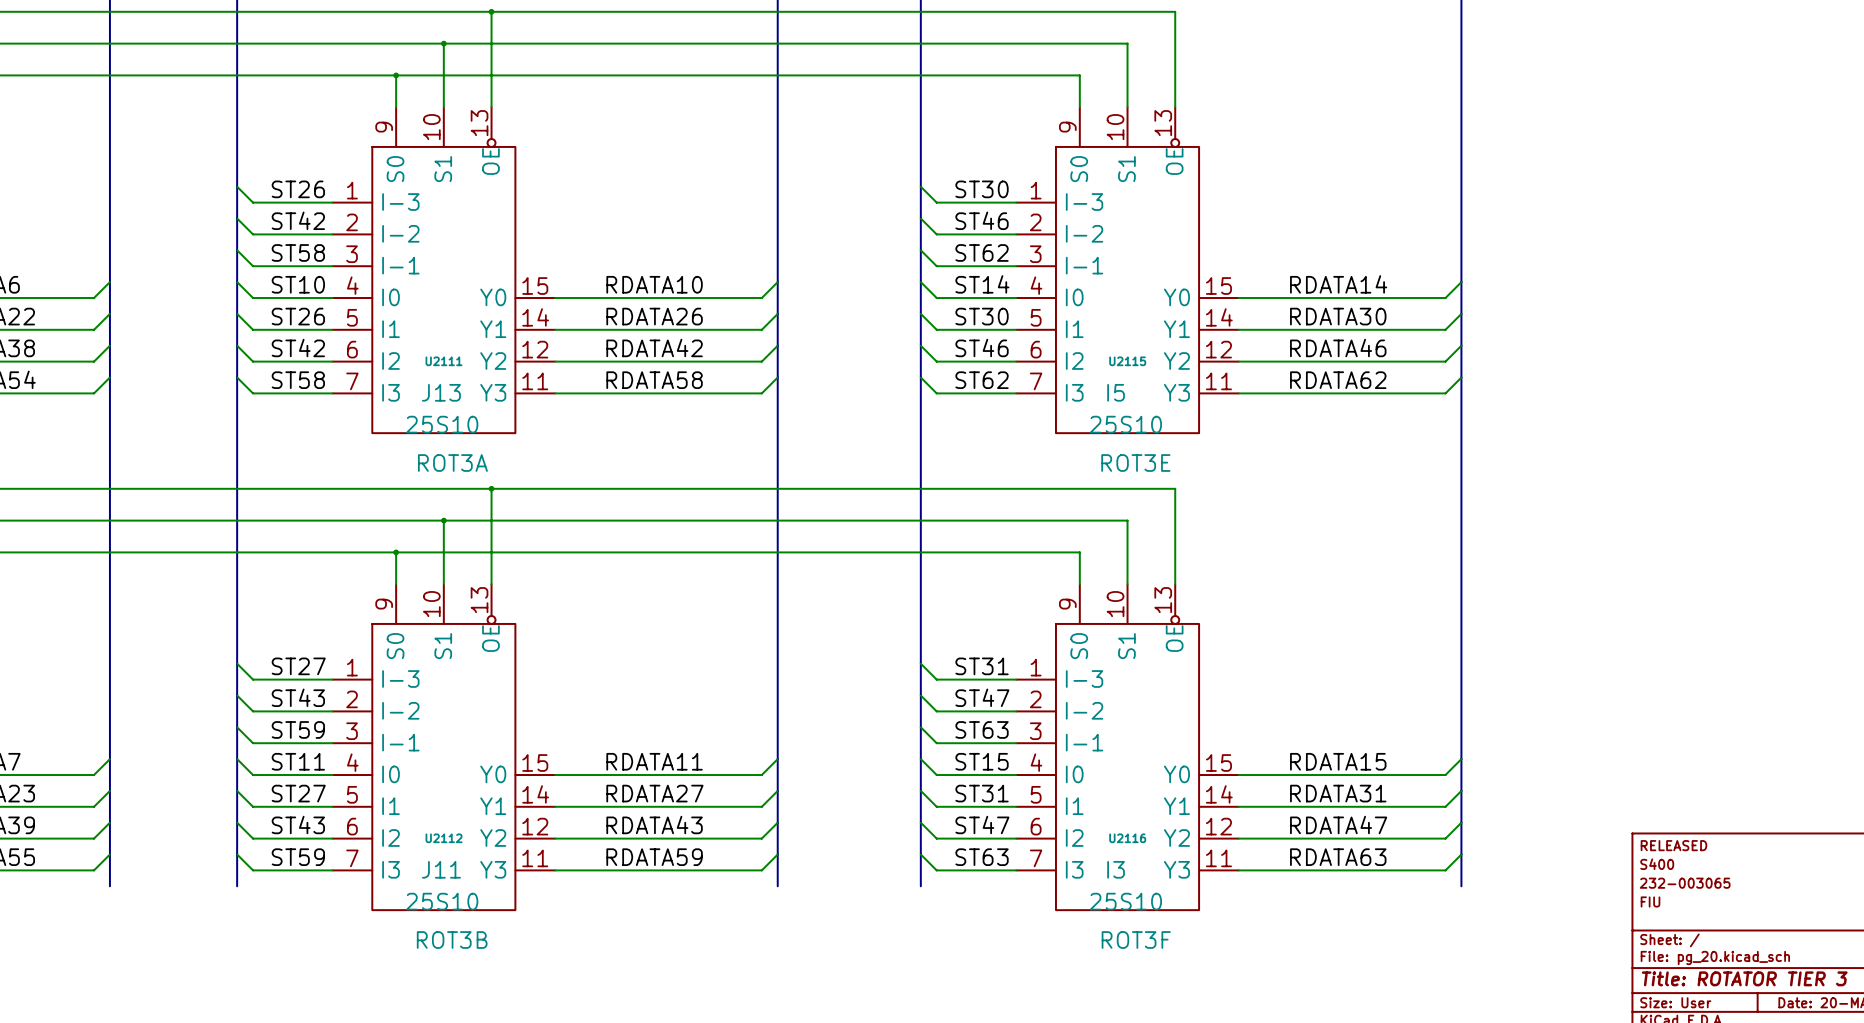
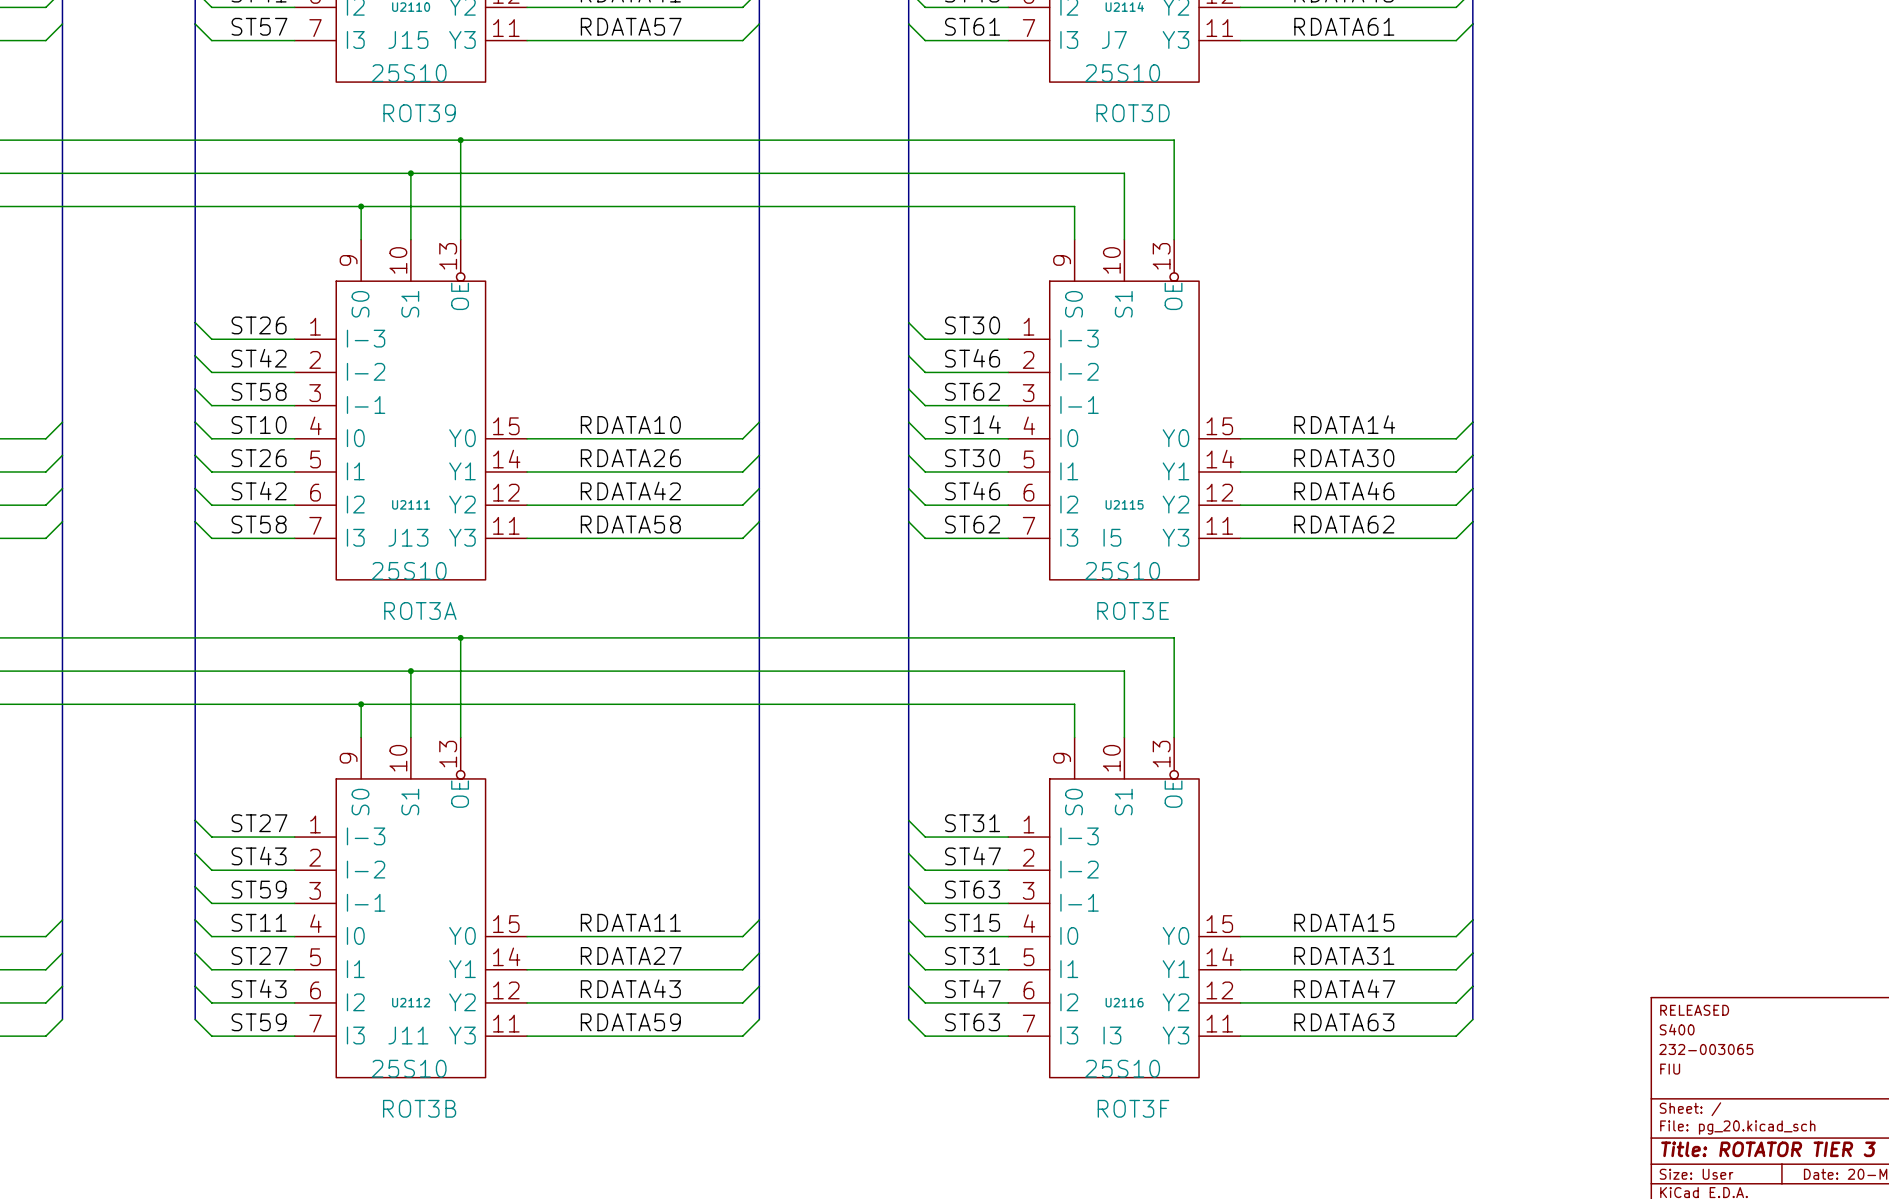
bus: (109, 854) (109, 886) -> none
bus: (237, 854) (237, 886) -> none
bus: (777, 854) (777, 886) -> none
bus: (920, 854) (920, 886) -> none
bus: (1461, 854) (1461, 886) -> none

